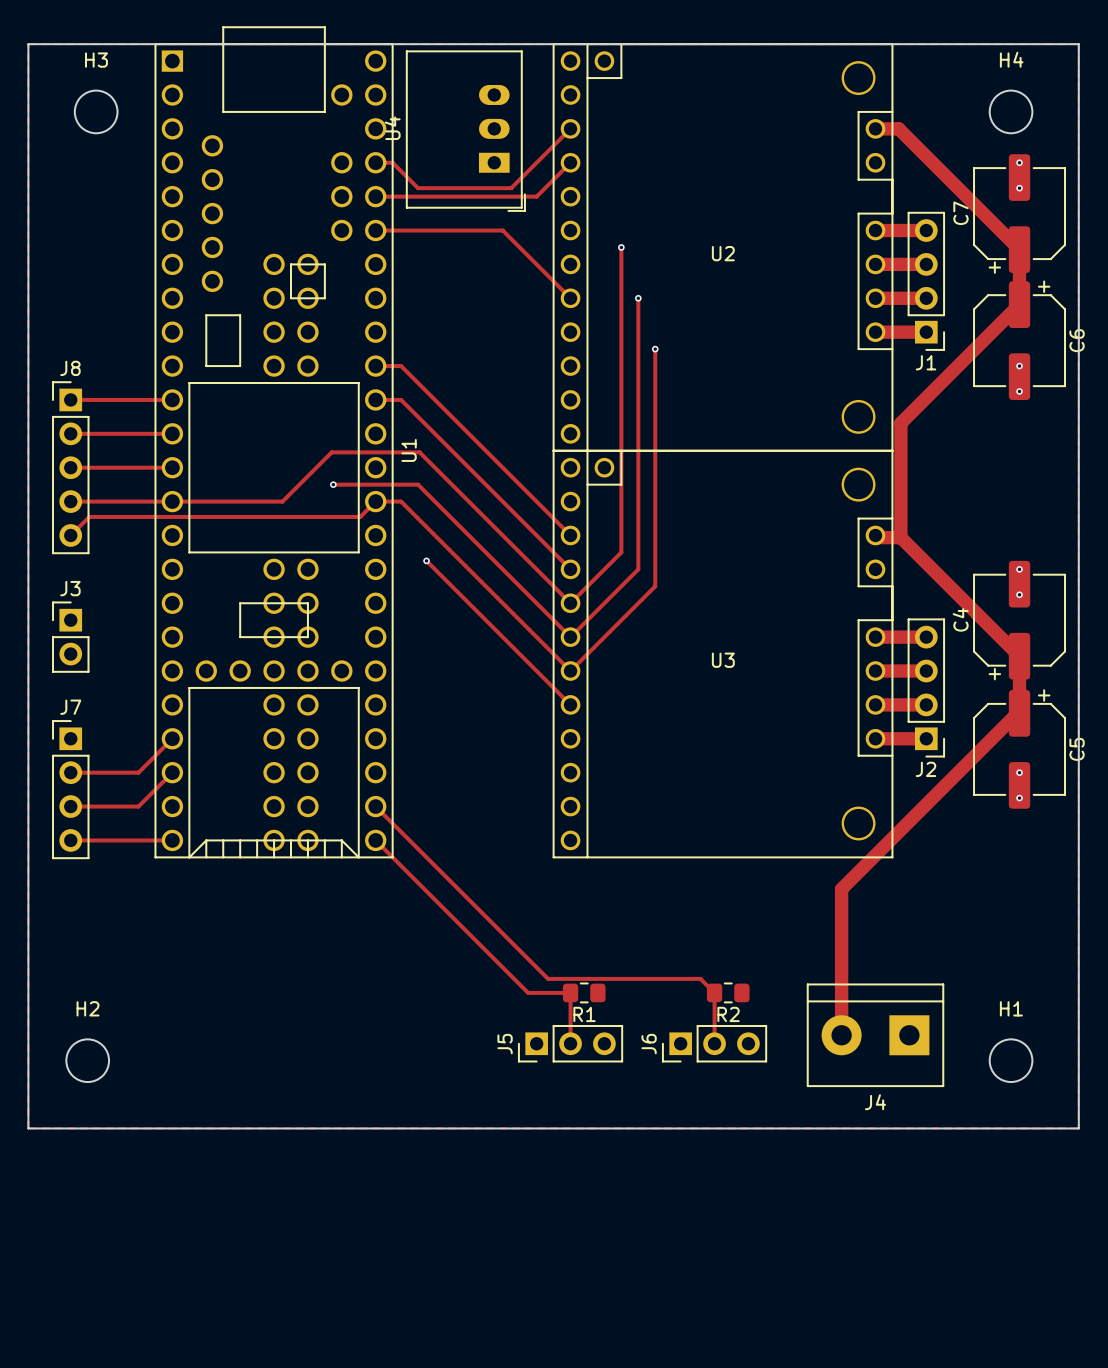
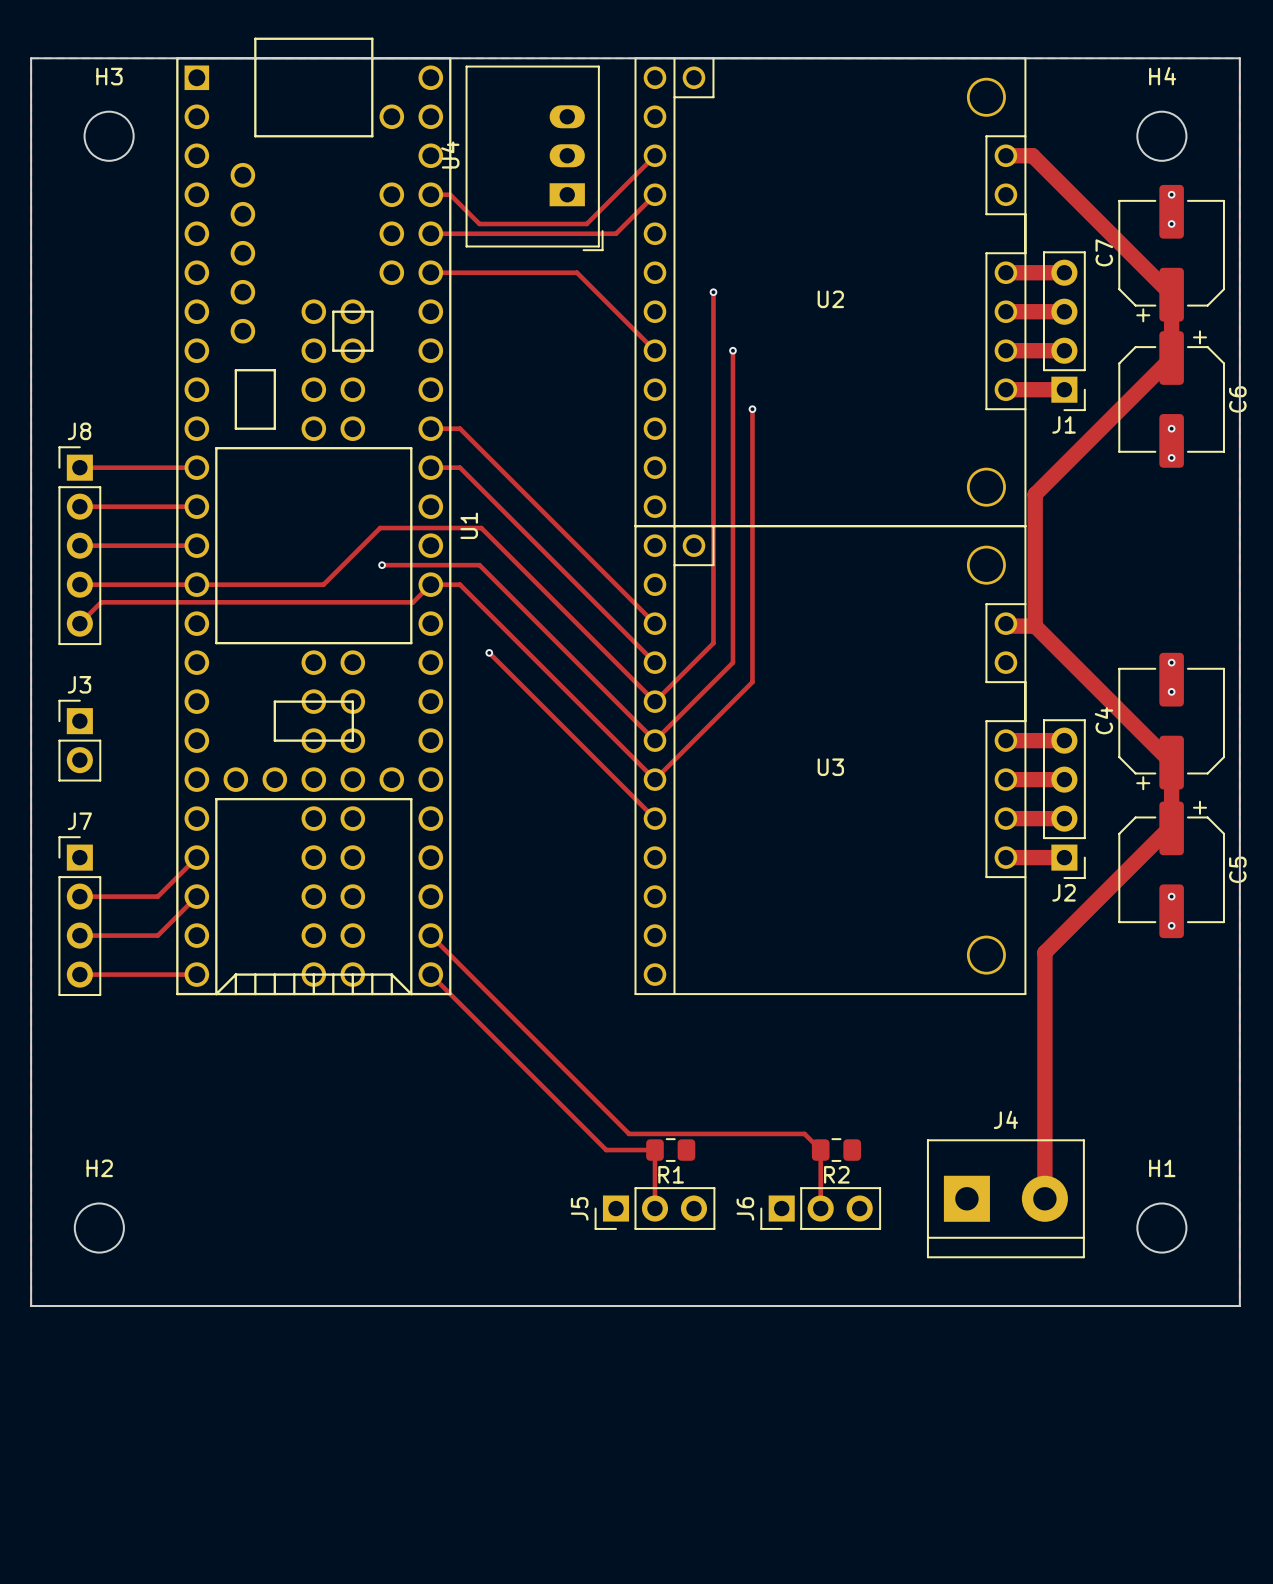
track: (909, 821) (841, 889) (841, 1035) -> (1044, 952) (1044, 1198)
J4 rotation: 0° (875, 1035) -> 180° (1005, 1198)

